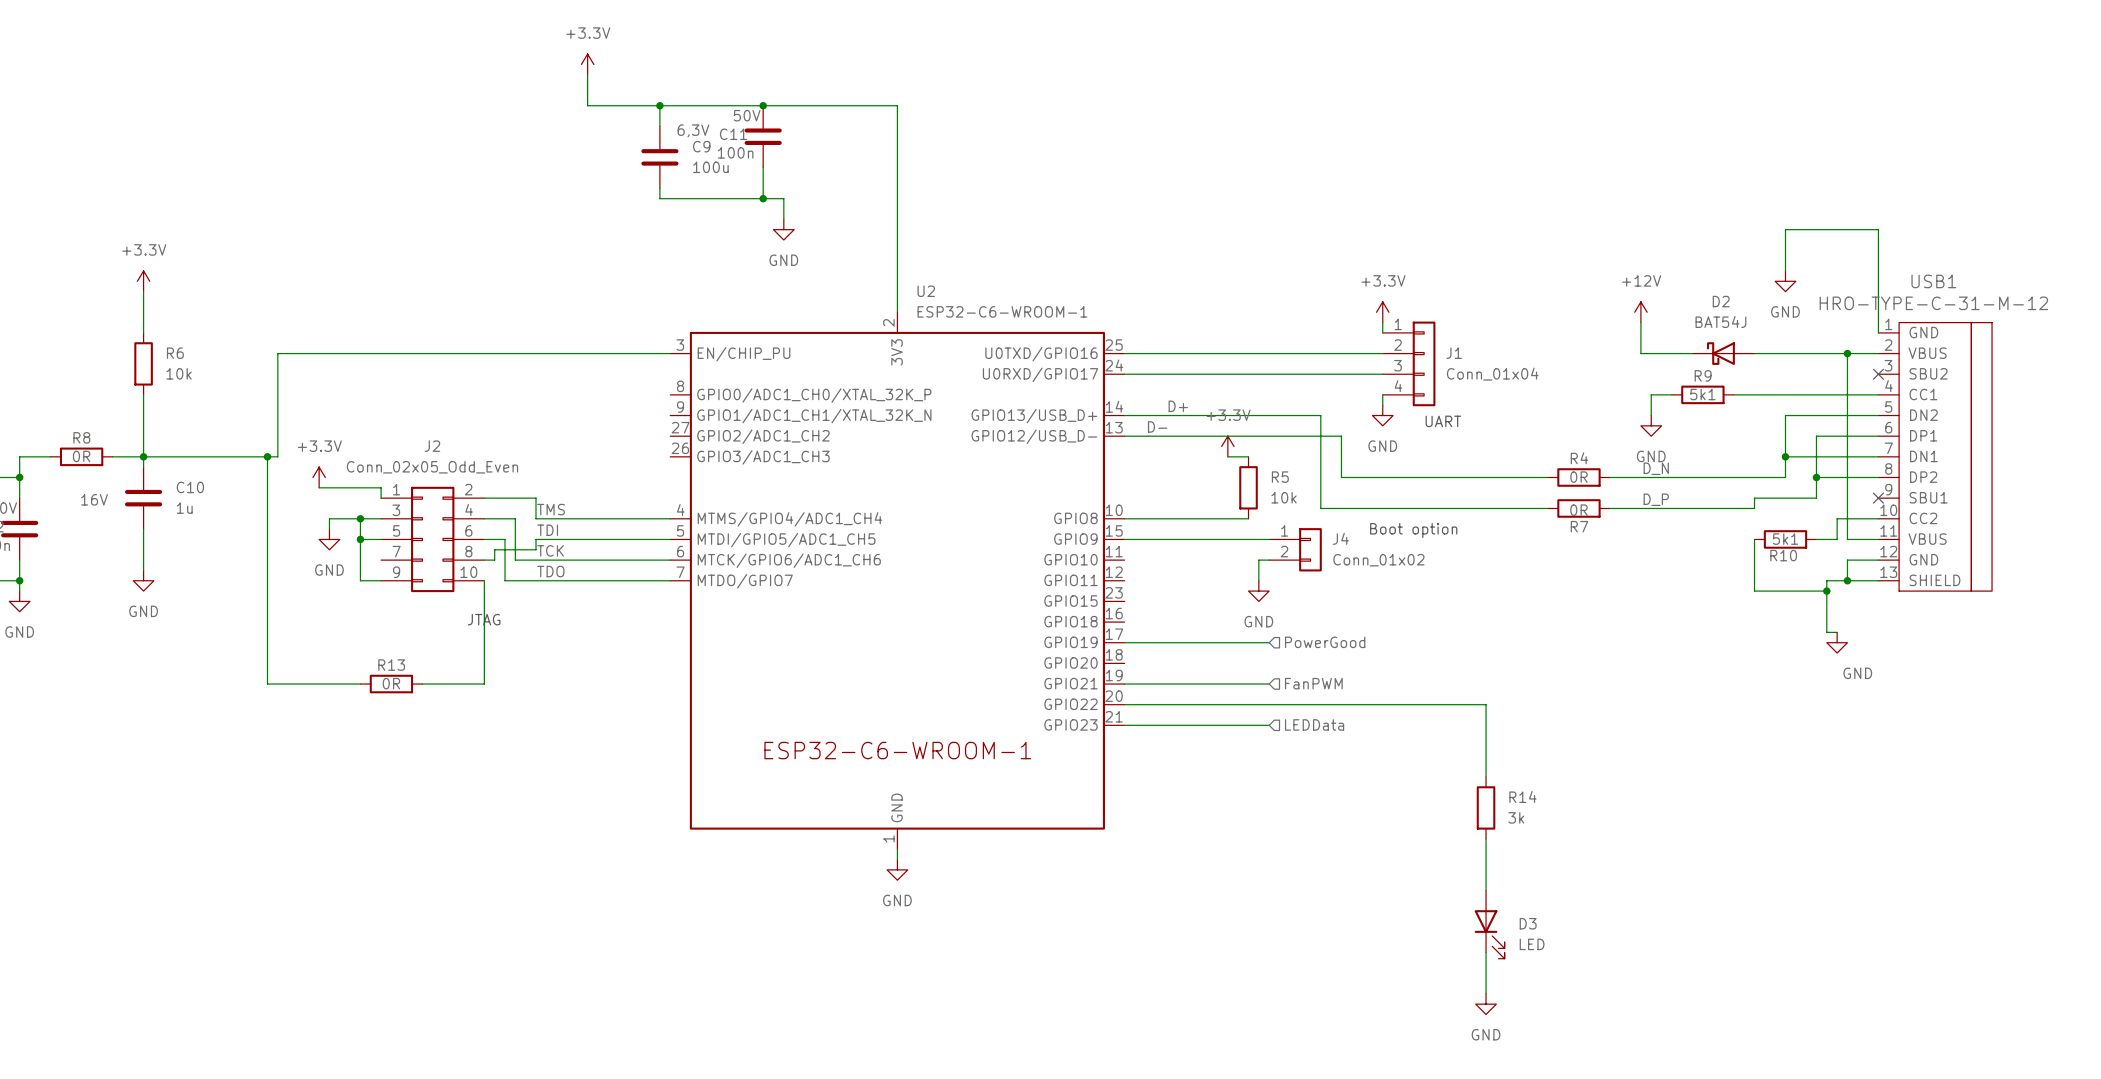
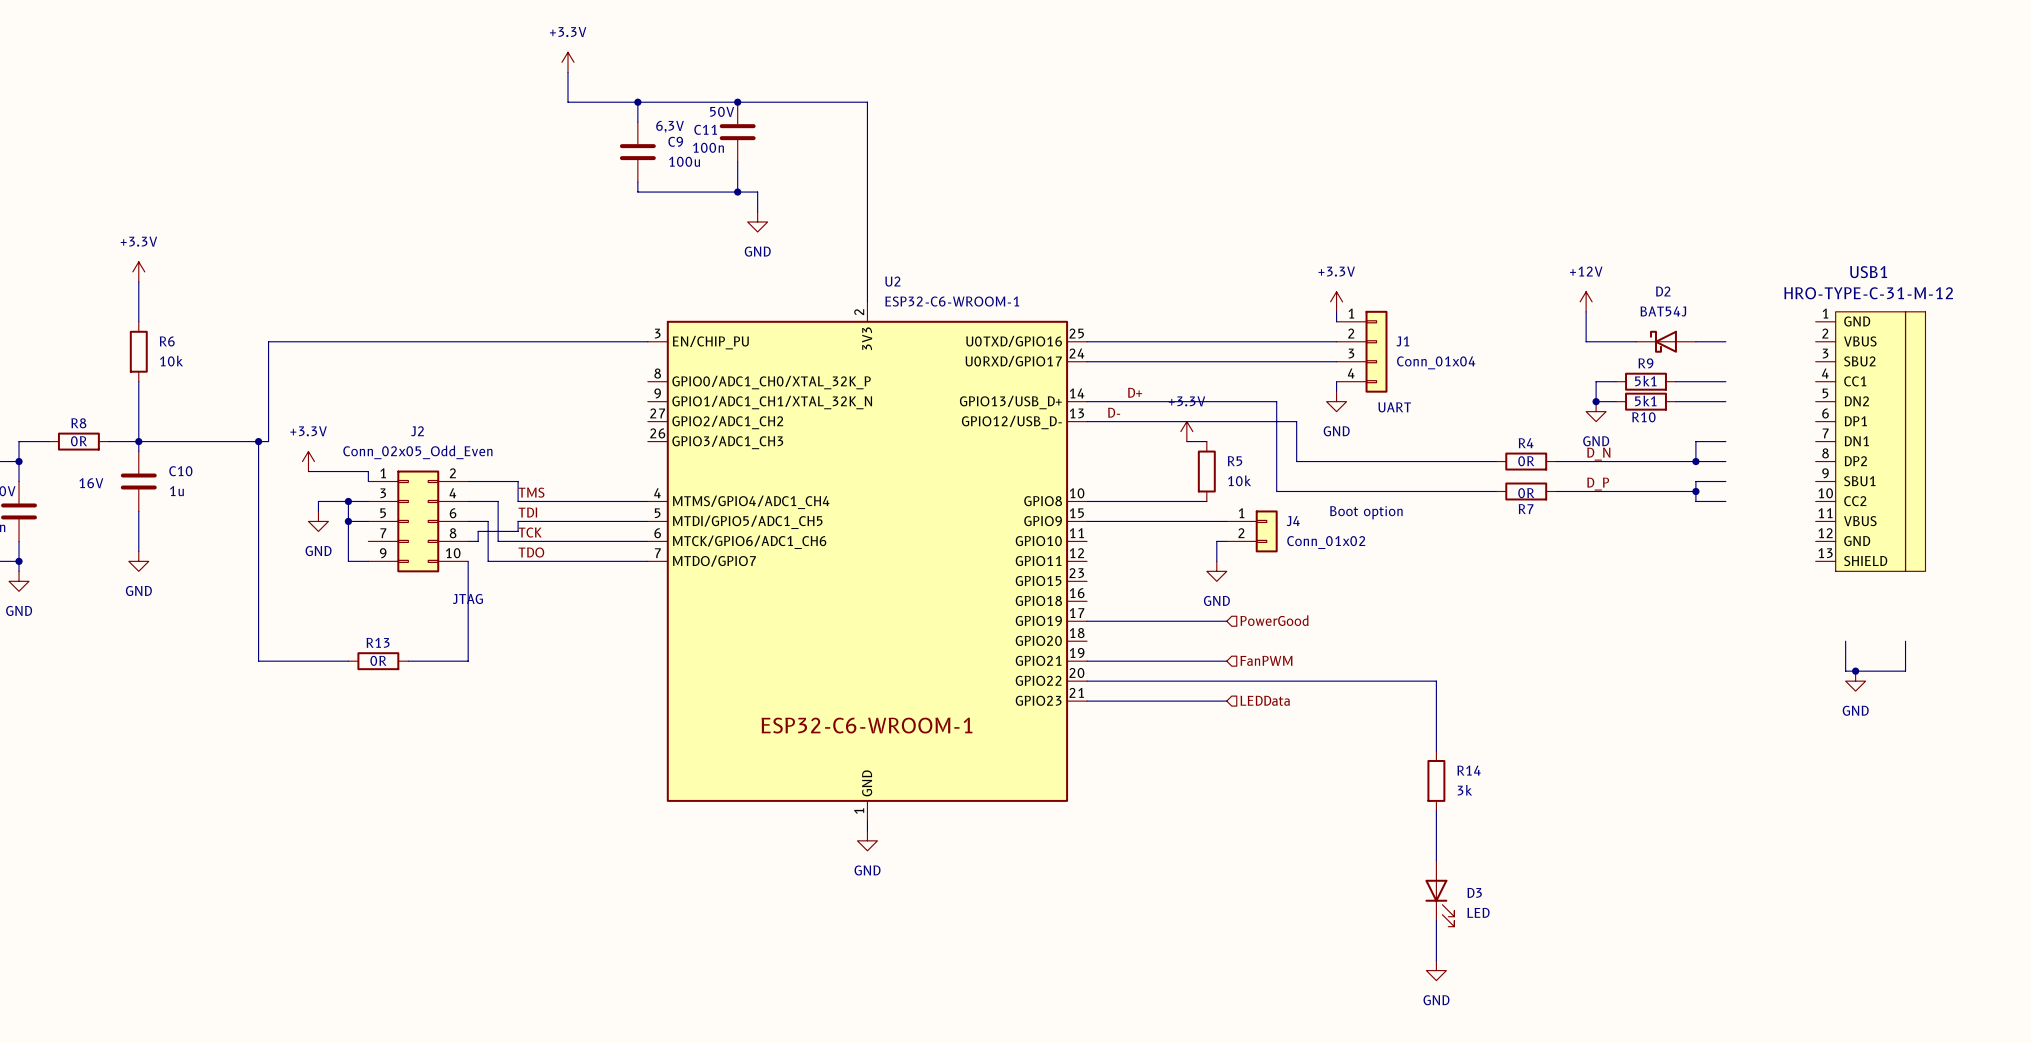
wire: (1785, 270) (1785, 229) (1878, 229) (1878, 332) -> none
power symbol: GND (1785, 281) -> none
wire: (1785, 353) (1878, 353) -> none
wire: (1847, 353) (1847, 539) (1878, 539) -> none
junction: (1847, 353) -> none
no-connect mark: (1878, 374) -> none
wire: (1785, 394) (1878, 394) -> none
wire: none -> (1596, 401) (1616, 401)
junction: none -> (1596, 401)
wire: none -> (1675, 401) (1725, 401)
wire: (1878, 415) (1785, 415) (1785, 477) -> none
wire: (1878, 436) (1816, 436) (1816, 498) (1785, 498) -> none
wire: (1785, 456) (1878, 456) -> (1725, 441) (1695, 441) (1695, 461)
junction: (1785, 456) -> none
junction: none -> (1695, 461)
wire: (1816, 477) (1878, 477) -> none
junction: (1816, 477) -> none
no-connect mark: (1878, 498) -> none
wire: none -> (1695, 491) (1695, 501) (1725, 501)
junction: none -> (1695, 491)
wire: (1878, 518) (1837, 518) (1837, 539) (1816, 539) -> none
wire: (1754, 539) (1754, 591) (1826, 591) -> none
R10 position: (1785, 539) -> (1646, 401)
wire: (1878, 560) (1847, 560) (1847, 580) -> none
junction: (1847, 580) -> none
wire: (1878, 580) (1826, 580) (1826, 632) (1837, 632) -> none
junction: (1826, 591) -> none
power symbol position: GND (1837, 642) -> GND (1855, 681)
wire: none -> (1845, 641) (1845, 671) (1905, 671) (1905, 641)
power symbol text position: GND (1857, 673) -> GND (1855, 710)
junction: none -> (1855, 671)

